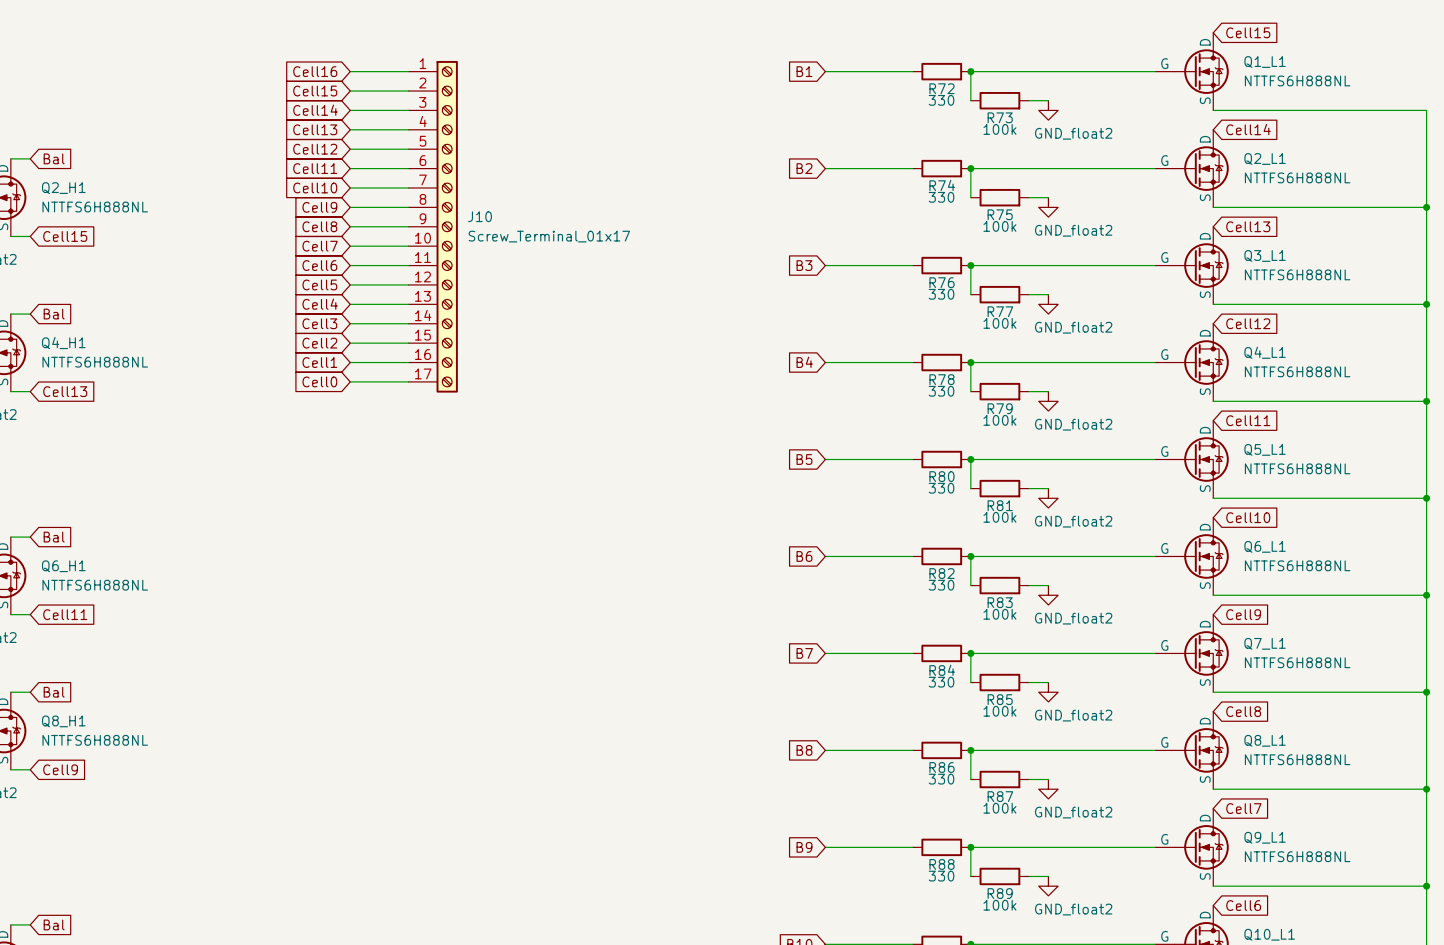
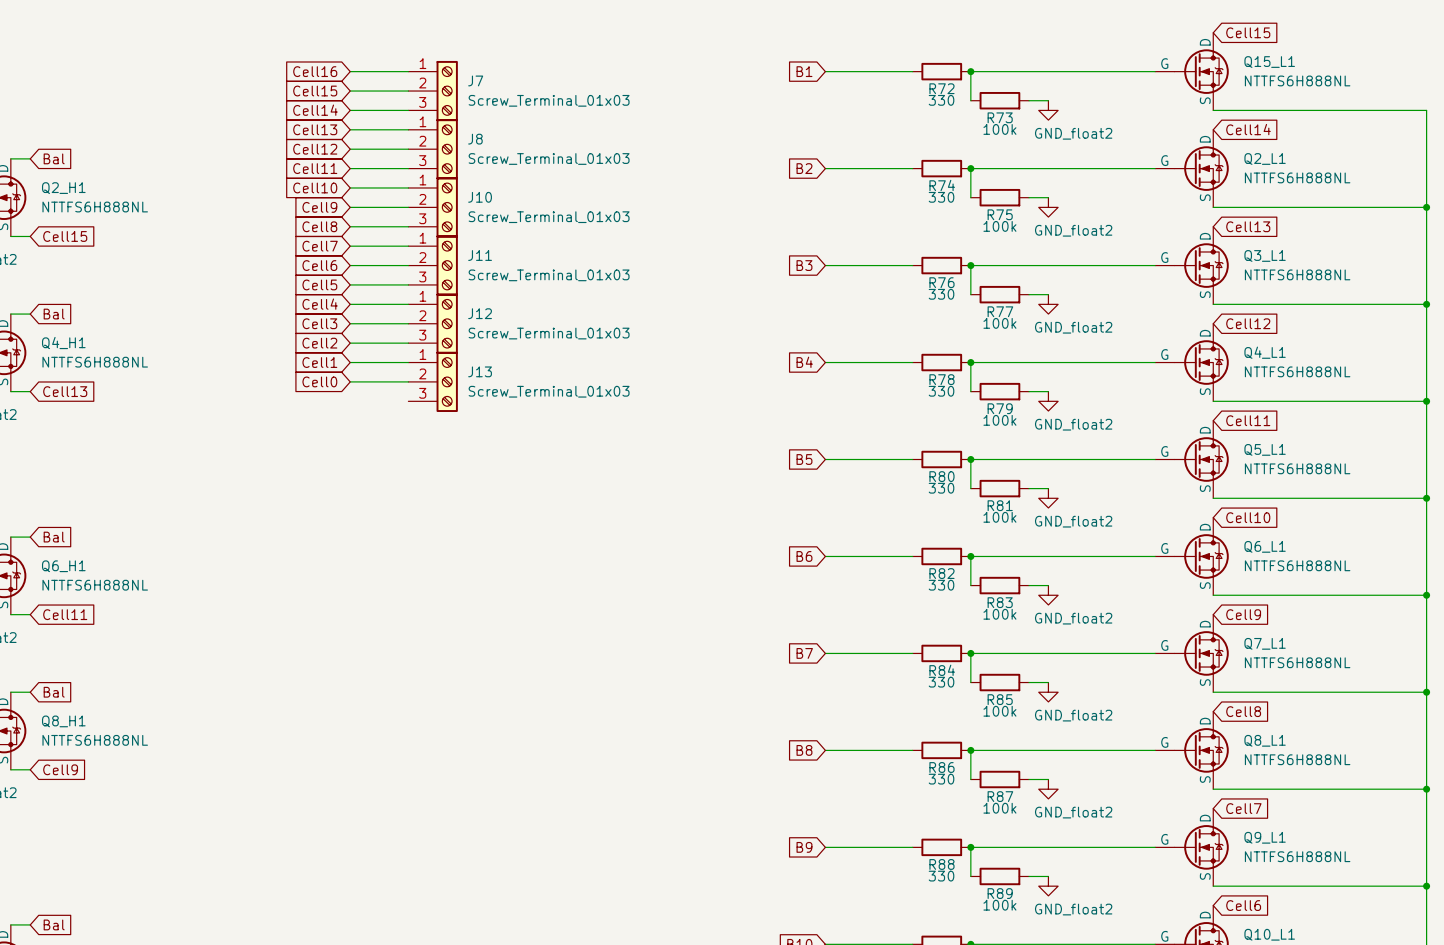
J10 symbol: [408, 60, 458, 393] -> [408, 177, 458, 238]
Q1_L1 name: Q1_L1 (1265, 62) -> Q15_L1 (1269, 62)
J7: none -> Screw_Terminal_01x03 (433, 91)
J8: none -> Screw_Terminal_01x03 (433, 149)
J10 value: Screw_Terminal_01x17 (549, 236) -> Screw_Terminal_01x03 (549, 217)
J11: none -> Screw_Terminal_01x03 (433, 265)
J12: none -> Screw_Terminal_01x03 (433, 323)
J13: none -> Screw_Terminal_01x03 (433, 381)

